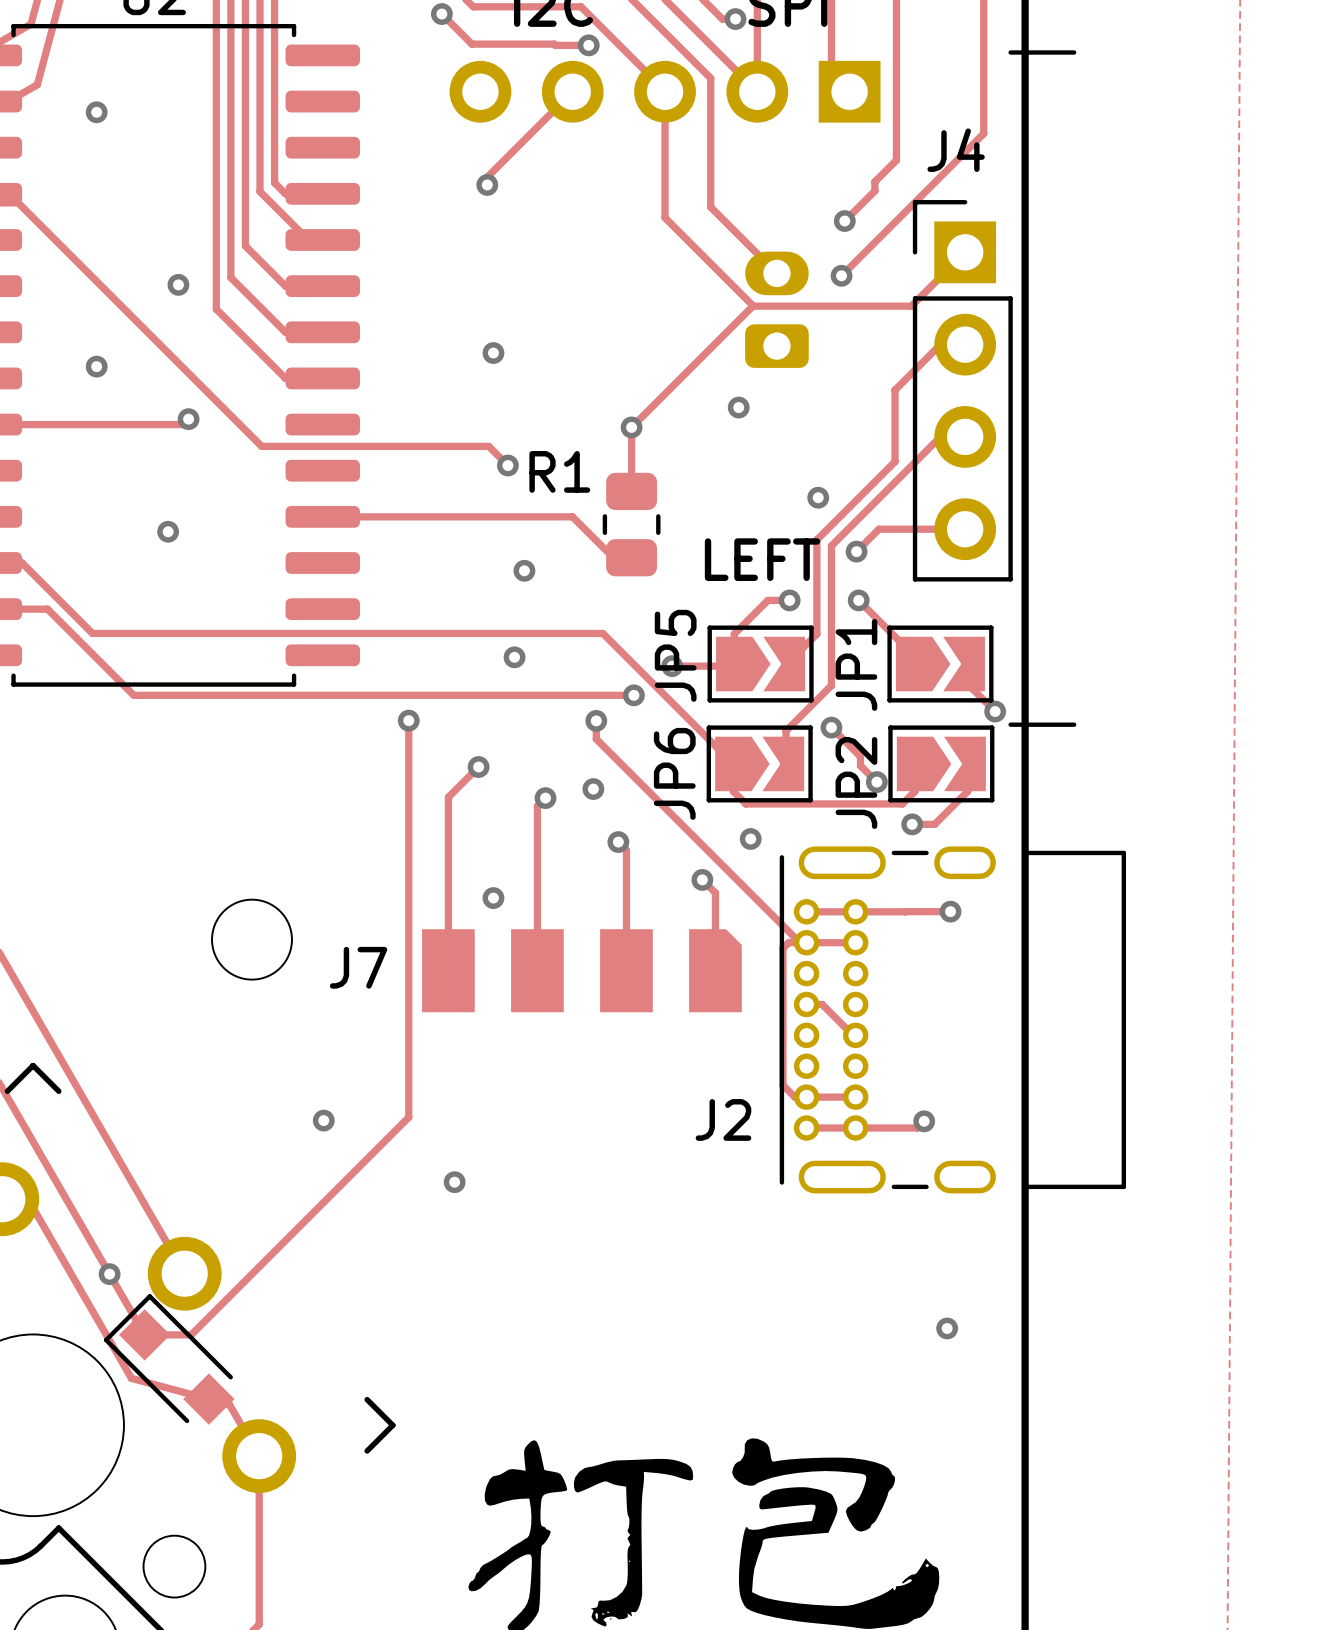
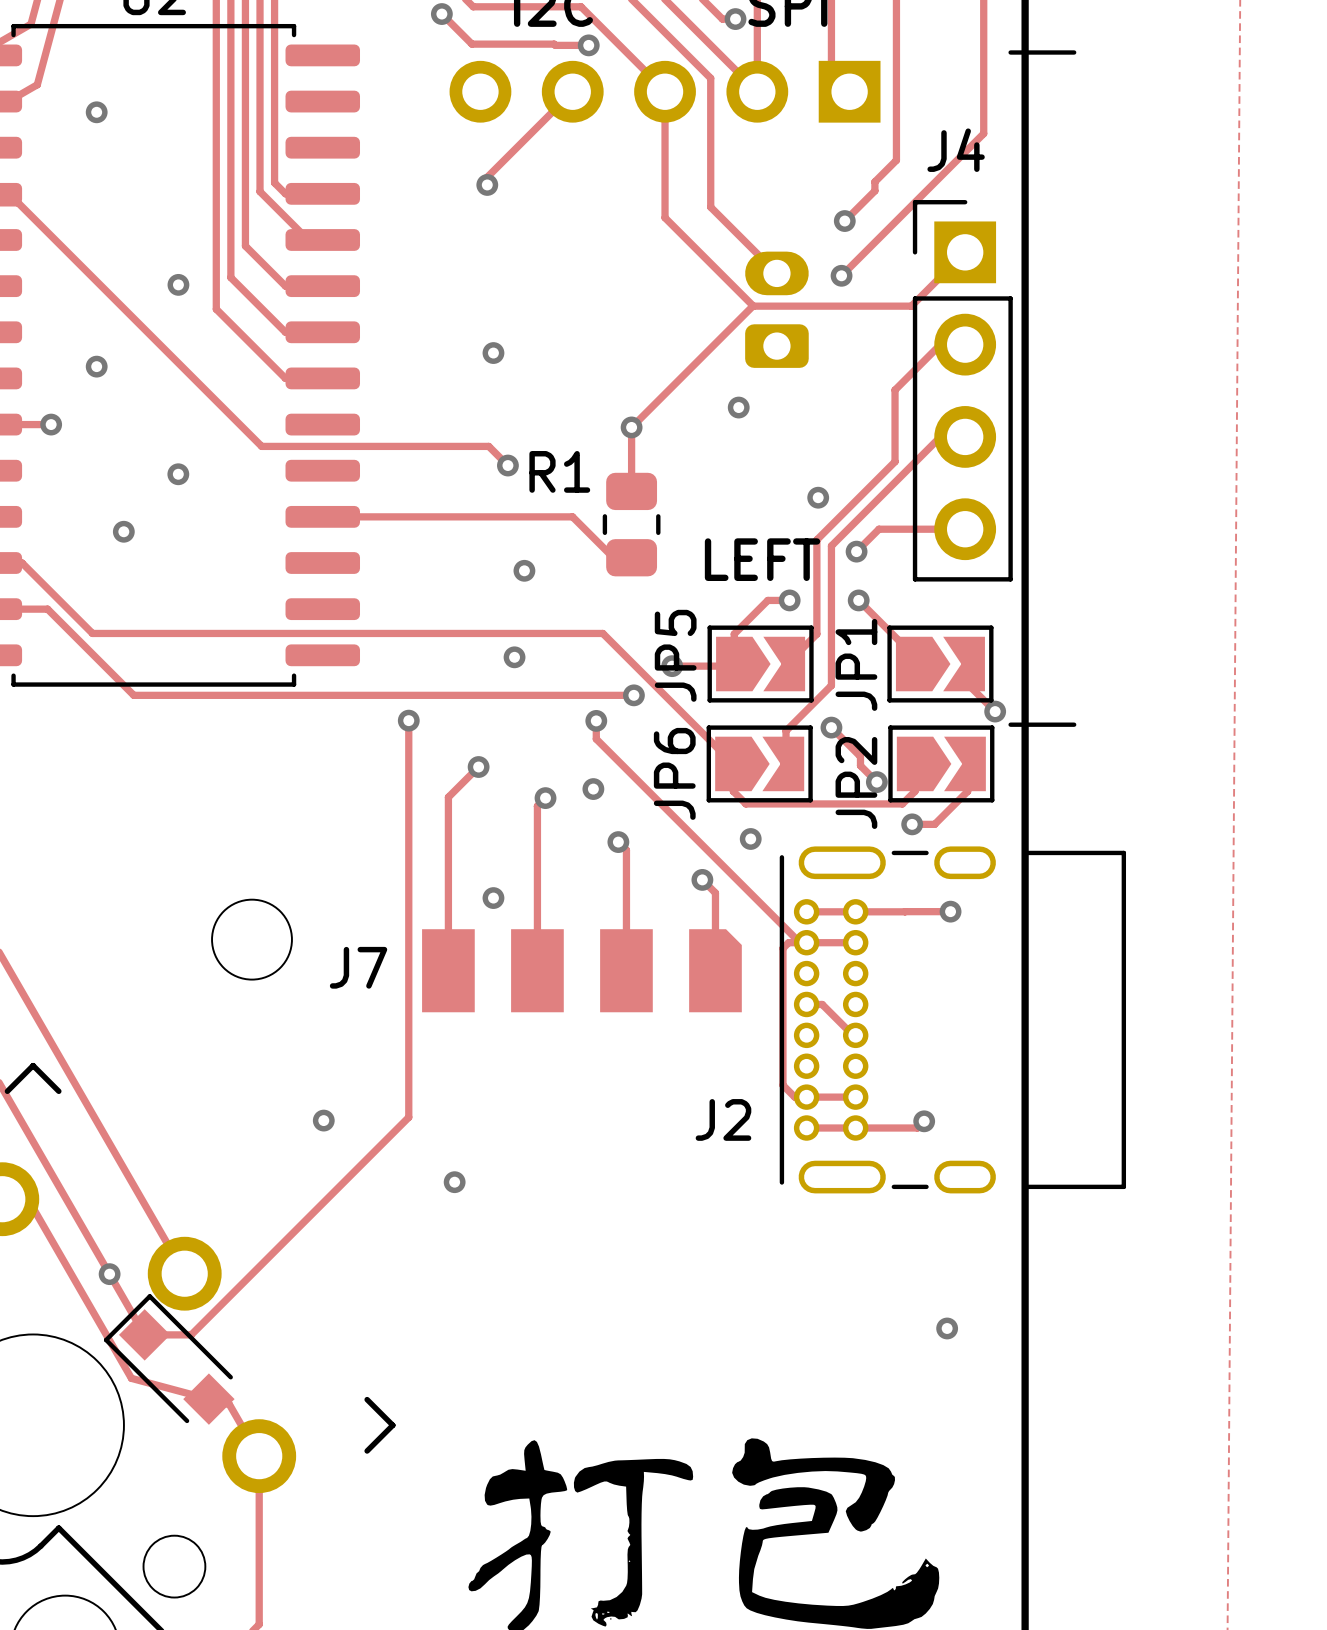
track: (188, 419) (183, 424) (51, 424) -> none
via: (188, 419) -> none
via: none -> (51, 424)
via: none -> (178, 474)
via: none -> (123, 531)
via: (168, 531) -> none

